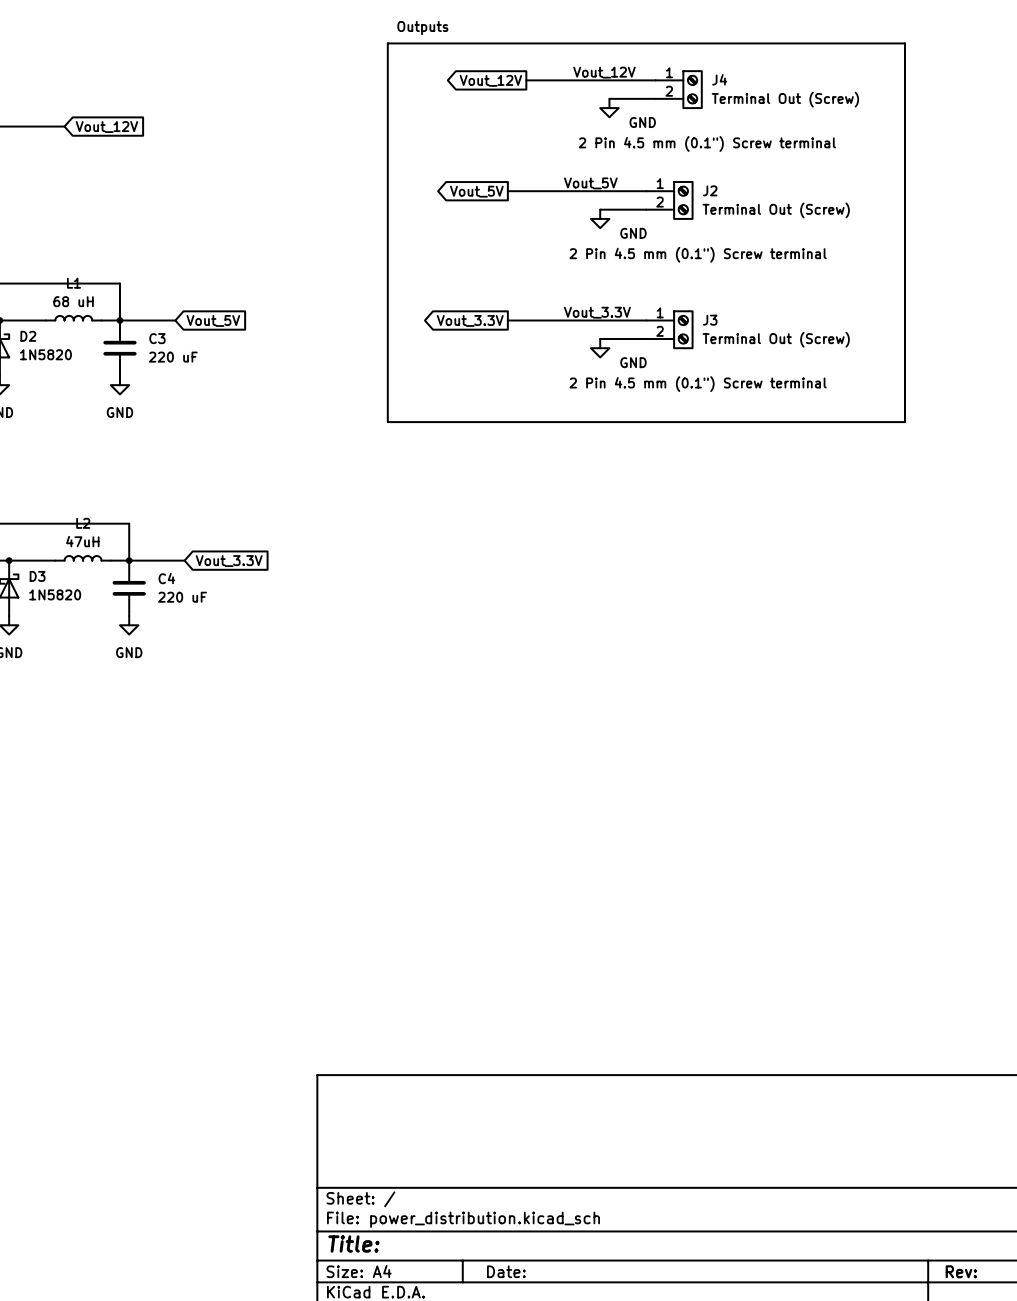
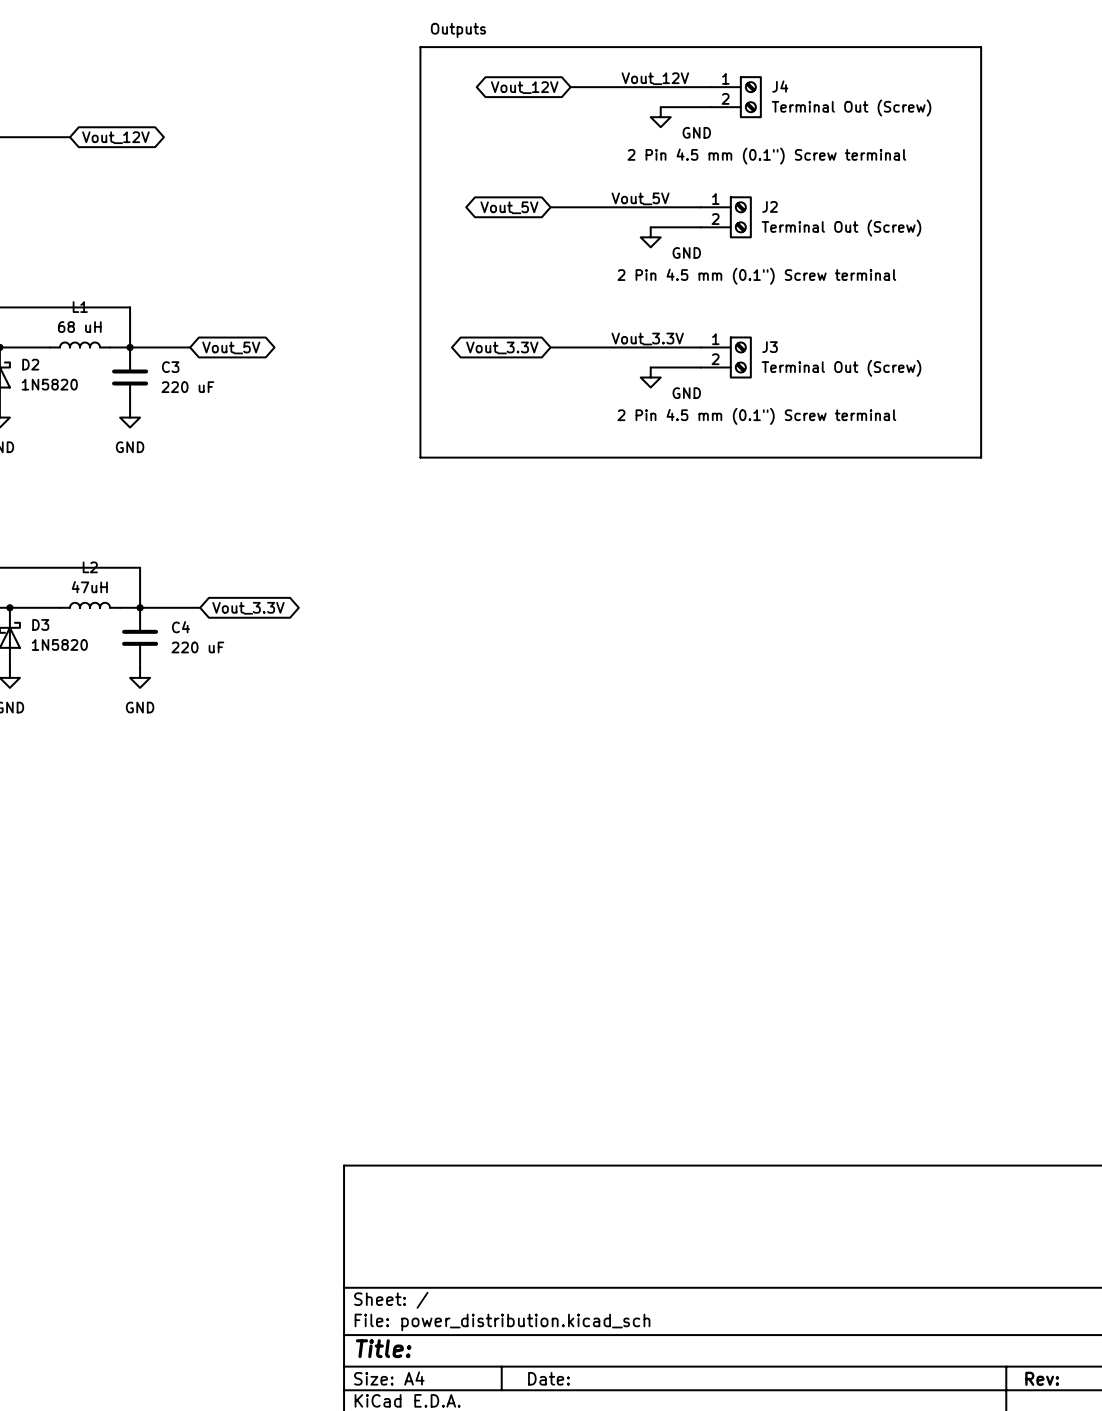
global label shape: output (490, 80) -> bidirectional (524, 87)
global label shape: input (106, 127) -> bidirectional (115, 137)
global label shape: output (476, 191) -> bidirectional (509, 207)
global label shape: input (213, 320) -> bidirectional (231, 347)
global label shape: output (470, 320) -> bidirectional (502, 347)
global label shape: input (229, 561) -> bidirectional (248, 608)

